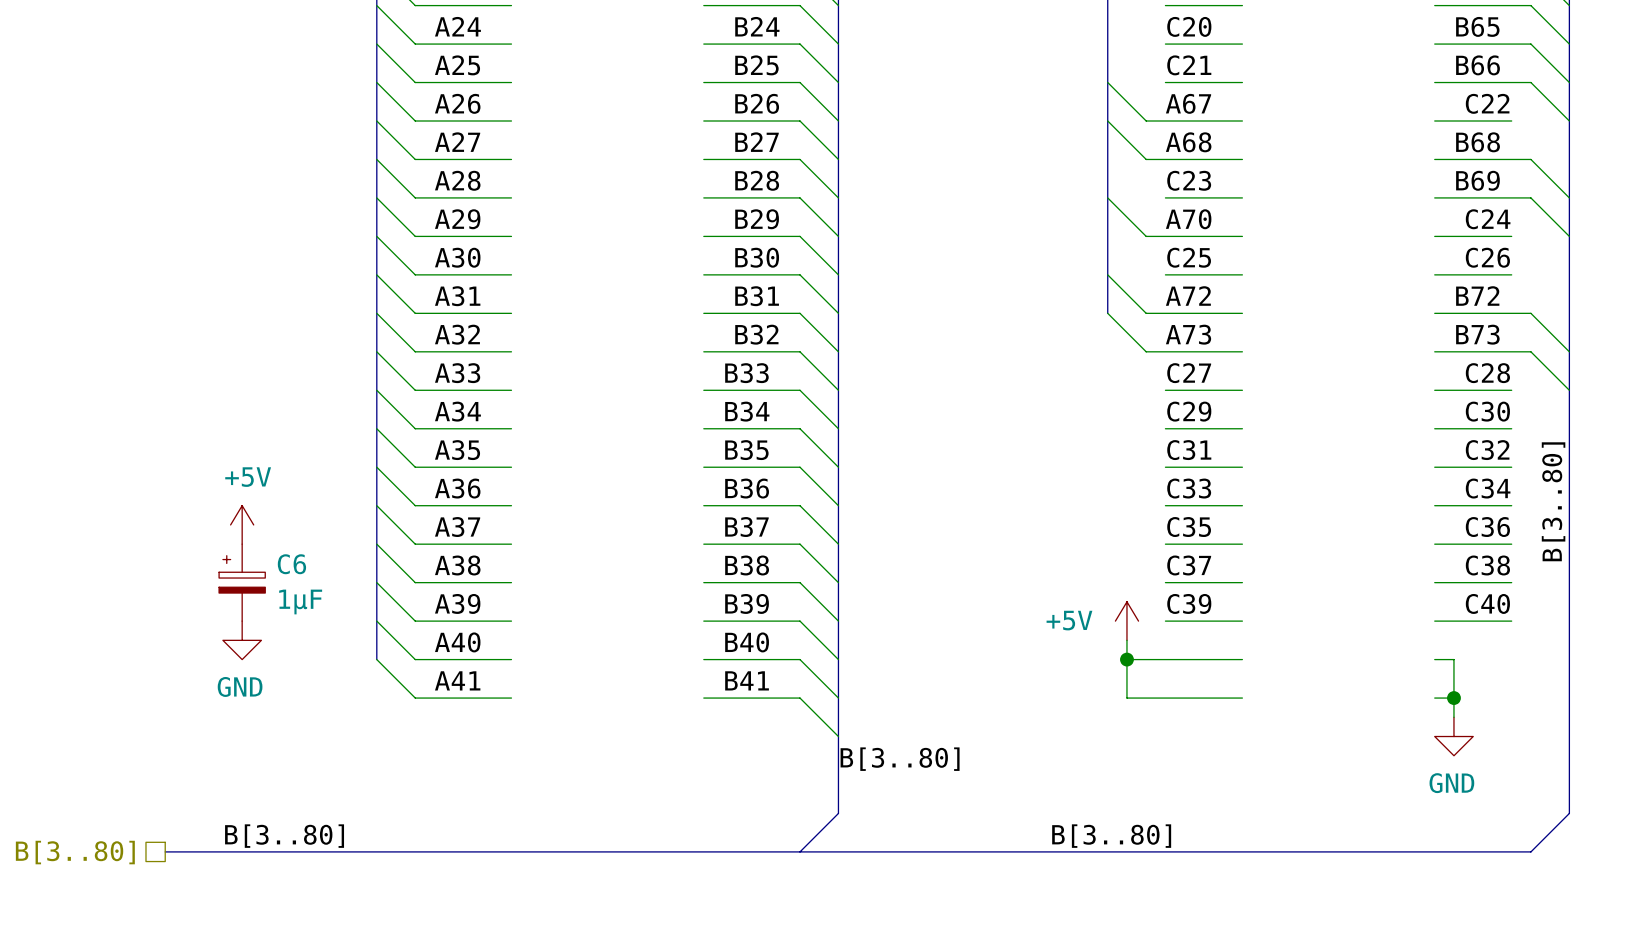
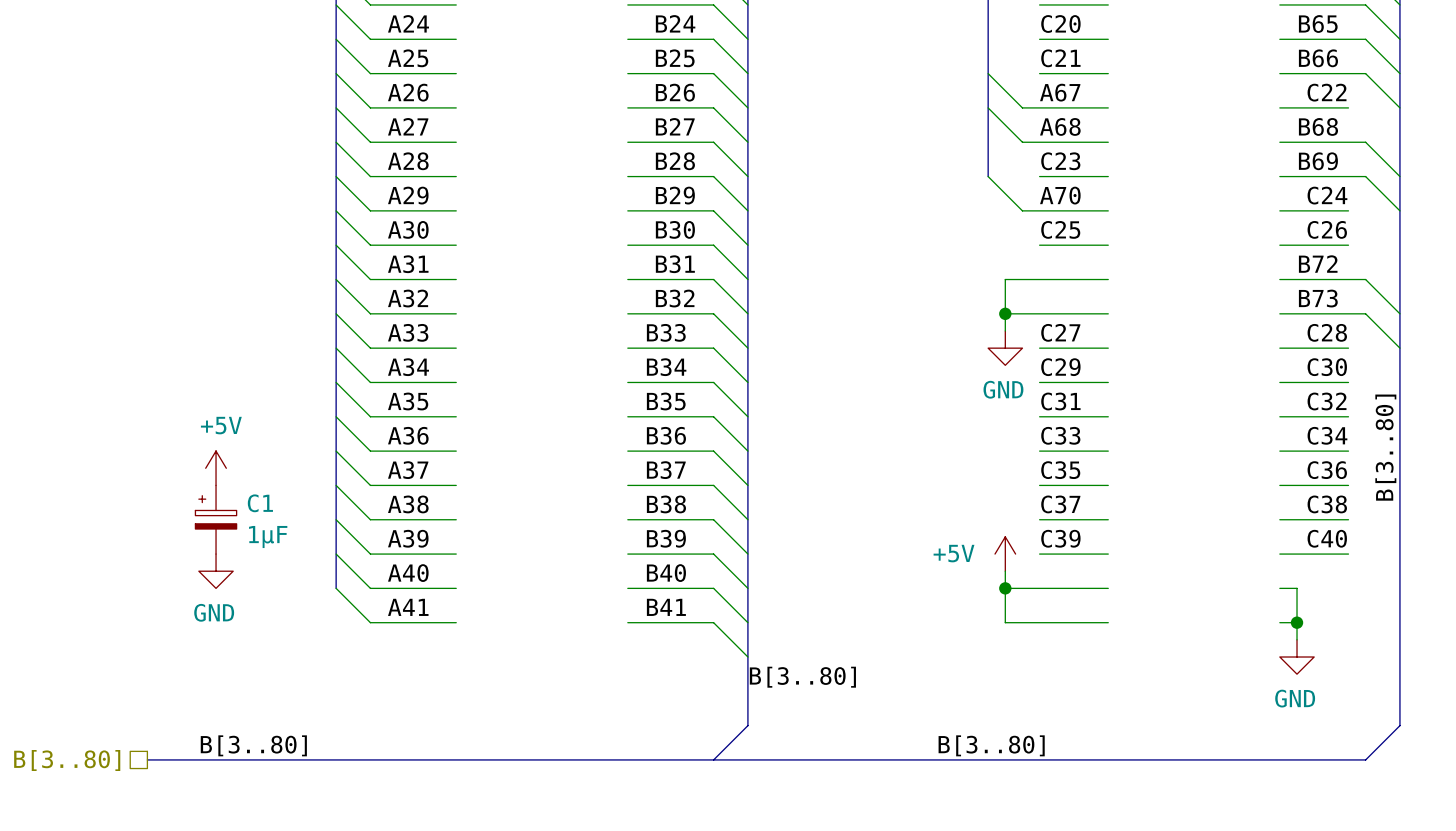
bus: (1107, 197) (1107, 313) -> none
wire: (1107, 274) (1146, 313) -> (1005, 330) (1005, 279) (1022, 279)
label: A72 (1188, 296) -> none
wire: (1107, 313) (1146, 351) -> (1005, 313) (1022, 313)
label: A73 (1188, 334) -> none
junction: none -> (1005, 313)
power symbol: none -> GND (1005, 348)
C6 name: C6 (291, 564) -> C1 (260, 503)

